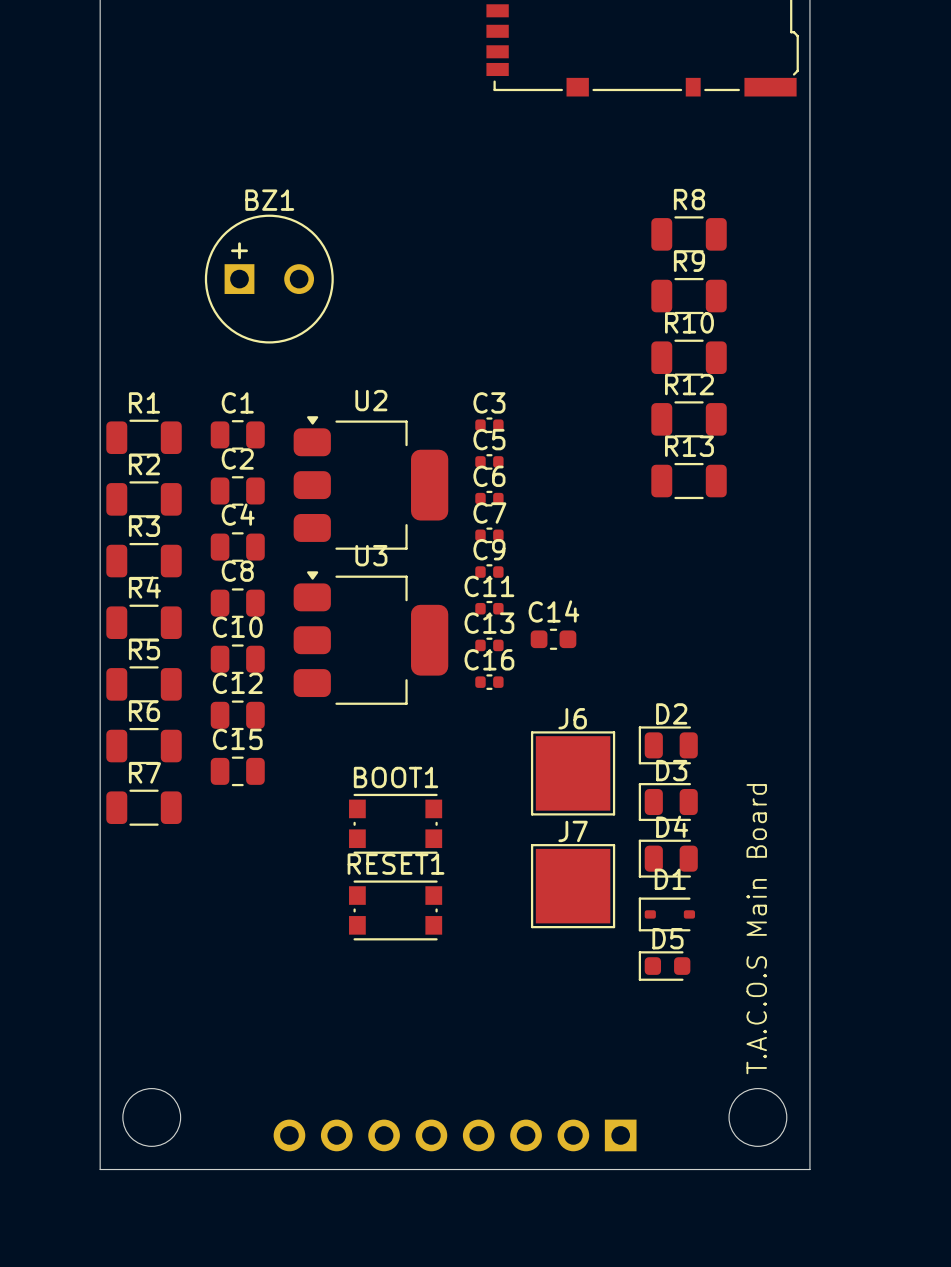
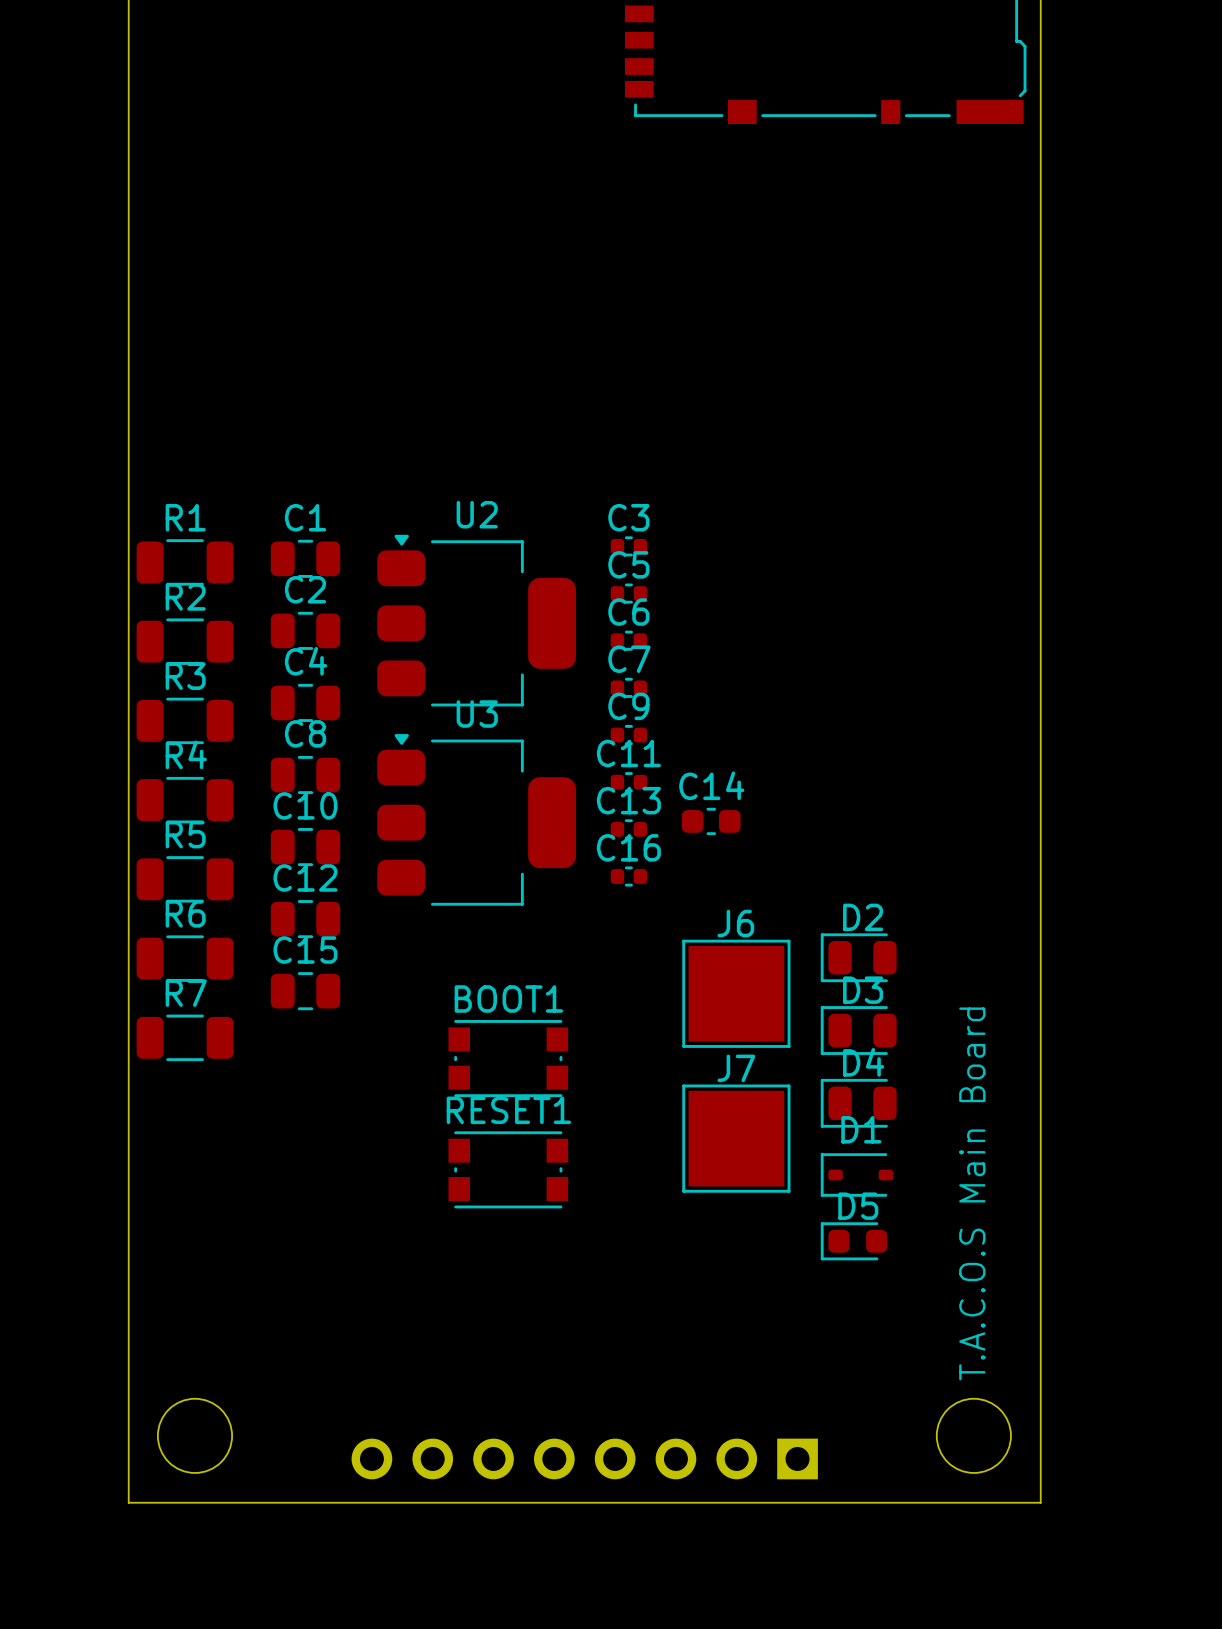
R8: (689, 234) -> none
BZ1: (269, 279) -> none
R9: (689, 296) -> none
R10: (689, 357) -> none
R12: (689, 419) -> none
R13: (689, 481) -> none

